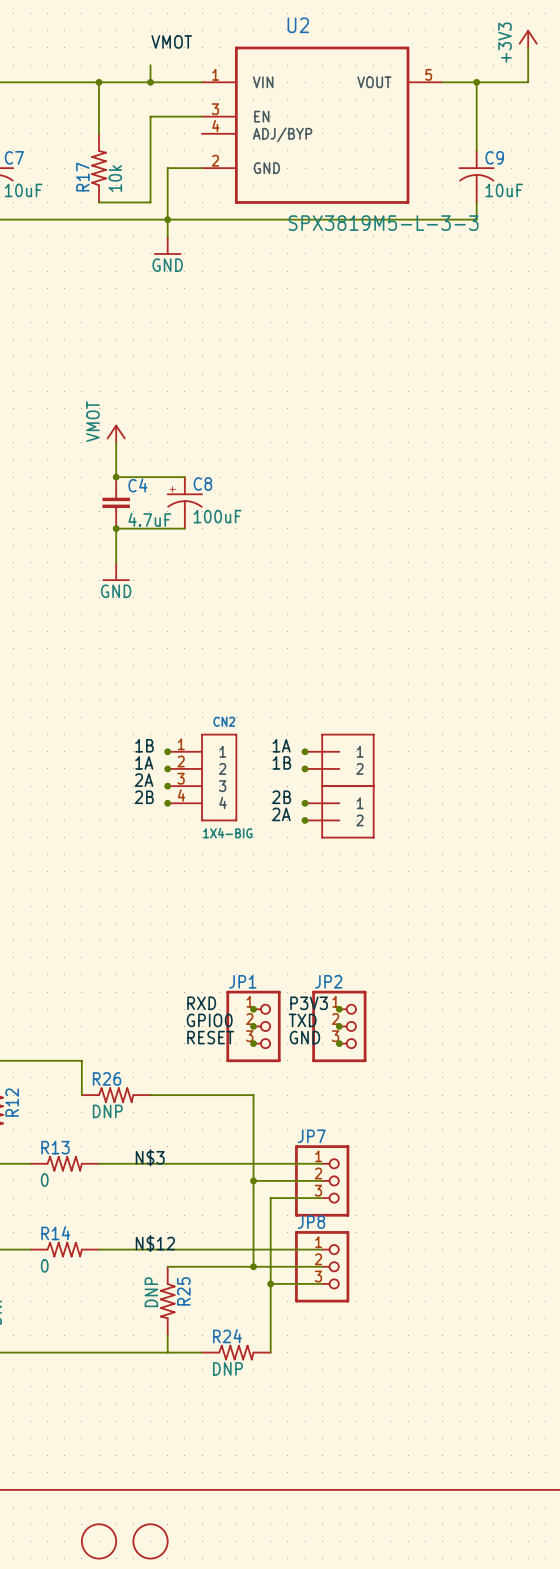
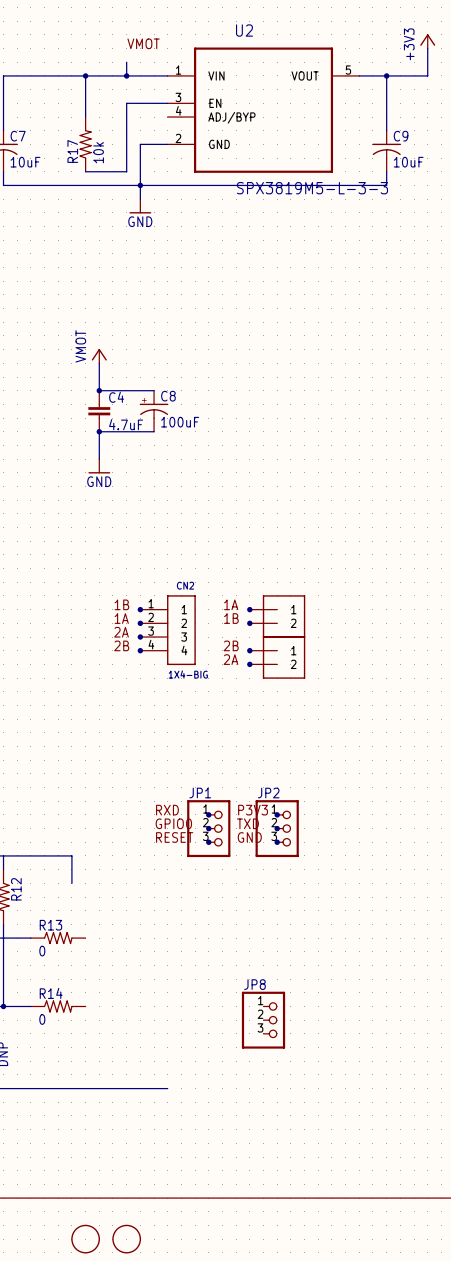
R26: DNP (116, 1095) -> none
wire: (150, 1095) (253, 1095) (253, 1266) -> none
label: N$3 (150, 1157) -> none
wire: (99, 1163) (322, 1163) -> none
wire: (253, 1180) (322, 1180) -> none
junction: (253, 1180) -> none
JP7: (322, 1180) -> none
wire: (322, 1198) (270, 1198) (270, 1352) -> none
label: N$12 (155, 1243) -> none
wire: (99, 1249) (322, 1249) -> none
wire: (167, 1266) (322, 1266) -> none
junction: (253, 1266) -> none
wire: (270, 1283) (322, 1283) -> none
junction: (270, 1283) -> none
R25: DNP (167, 1301) -> none
wire: (167, 1335) (167, 1352) -> none
R24: DNP (236, 1352) -> none

